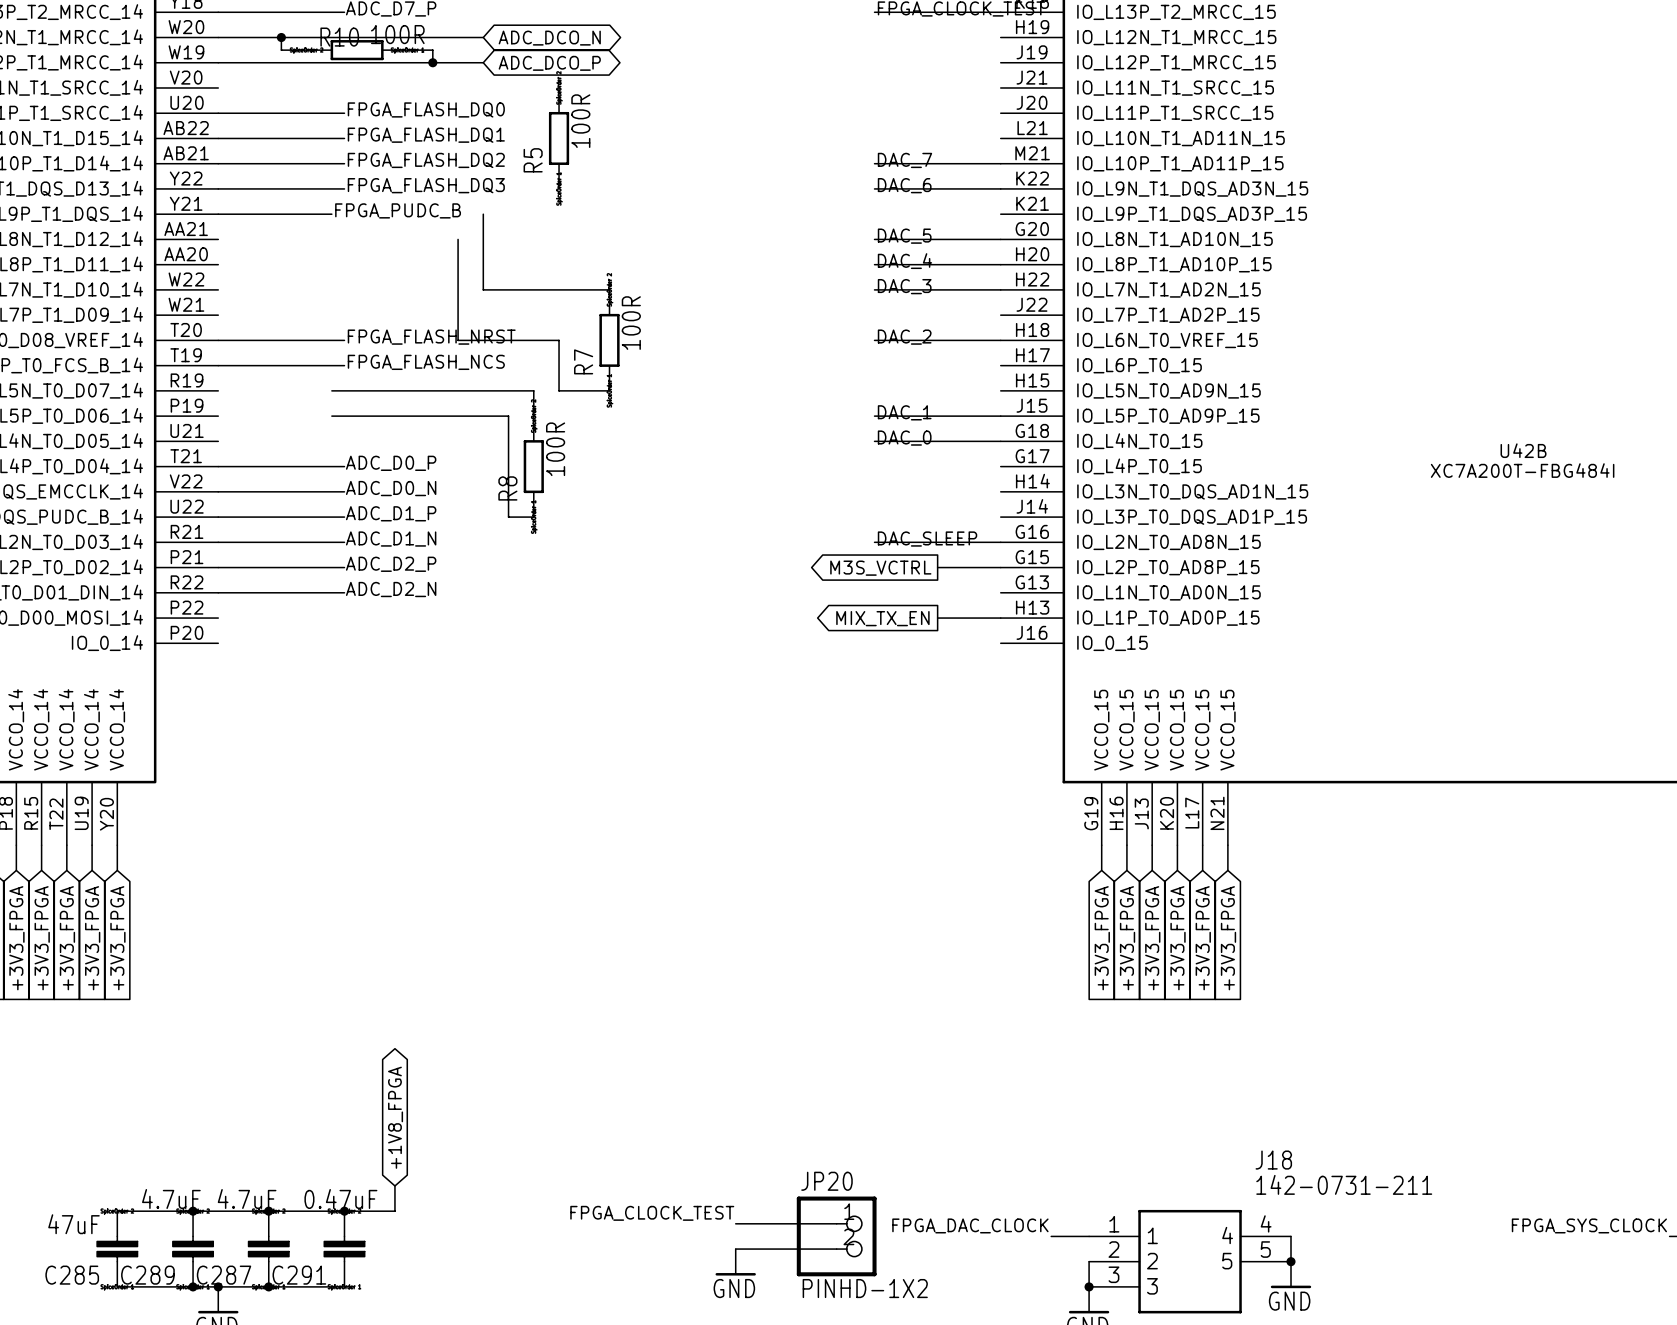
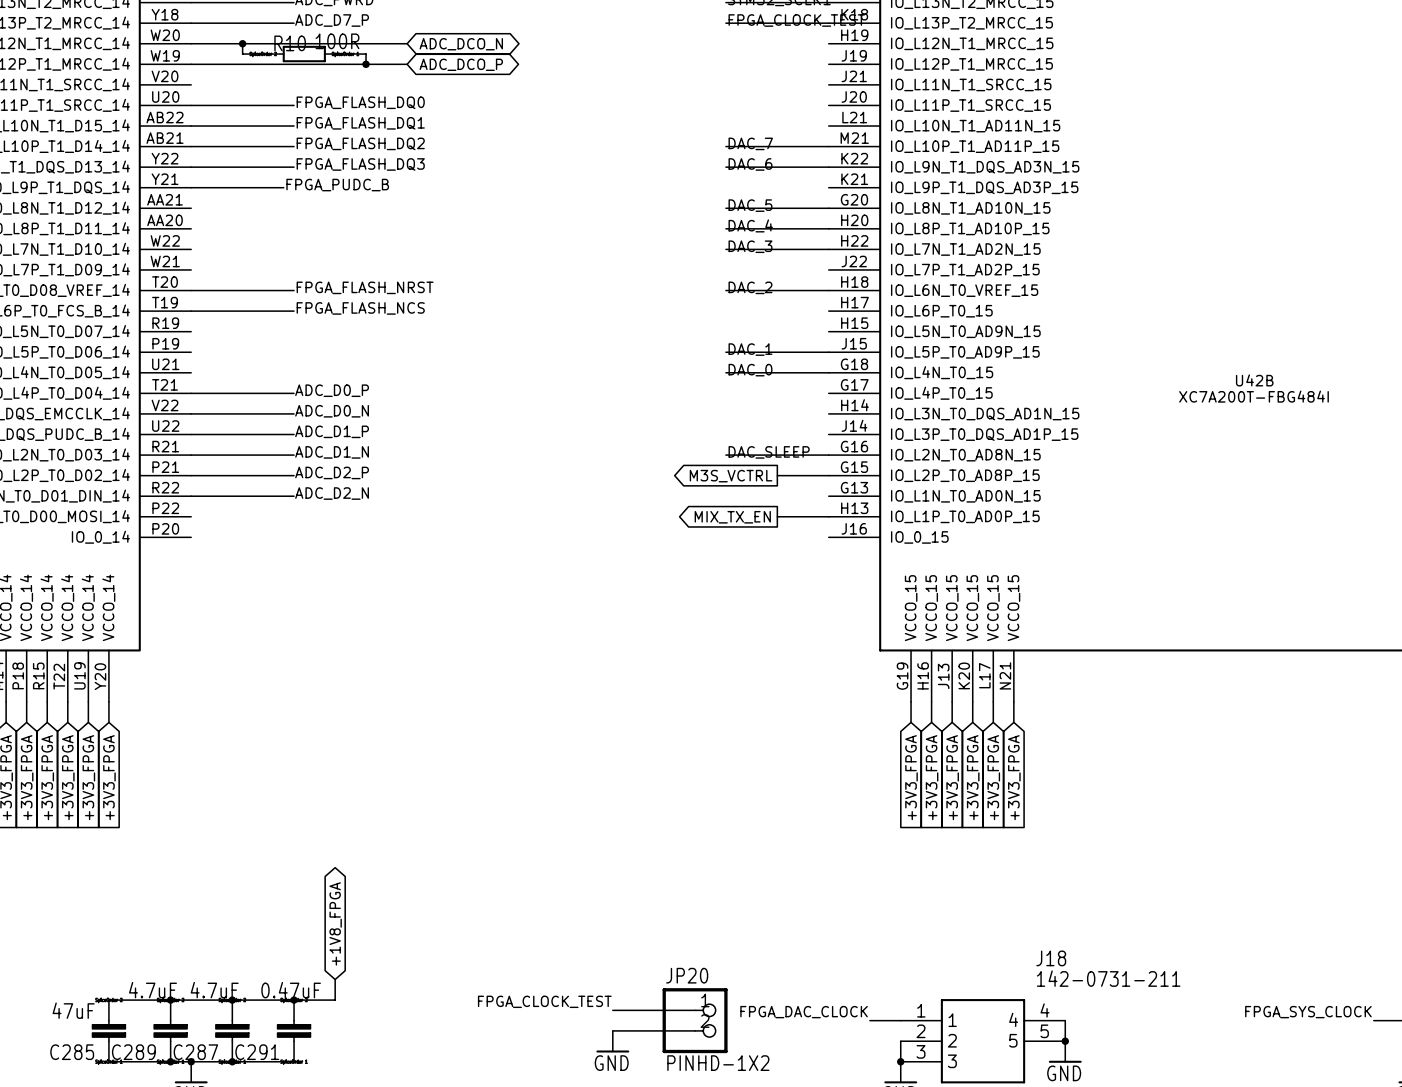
R5: 100R (559, 138) -> none
wire: (483, 214) (483, 289) (609, 289) -> none
wire: (458, 239) (458, 340) (559, 340) (559, 390) (609, 390) -> none
R7: 100R (609, 340) -> none
wire: (331, 390) (533, 390) (533, 416) -> none
wire: (331, 416) (508, 416) (508, 517) (533, 517) -> none
R8: 100R (533, 466) -> none

